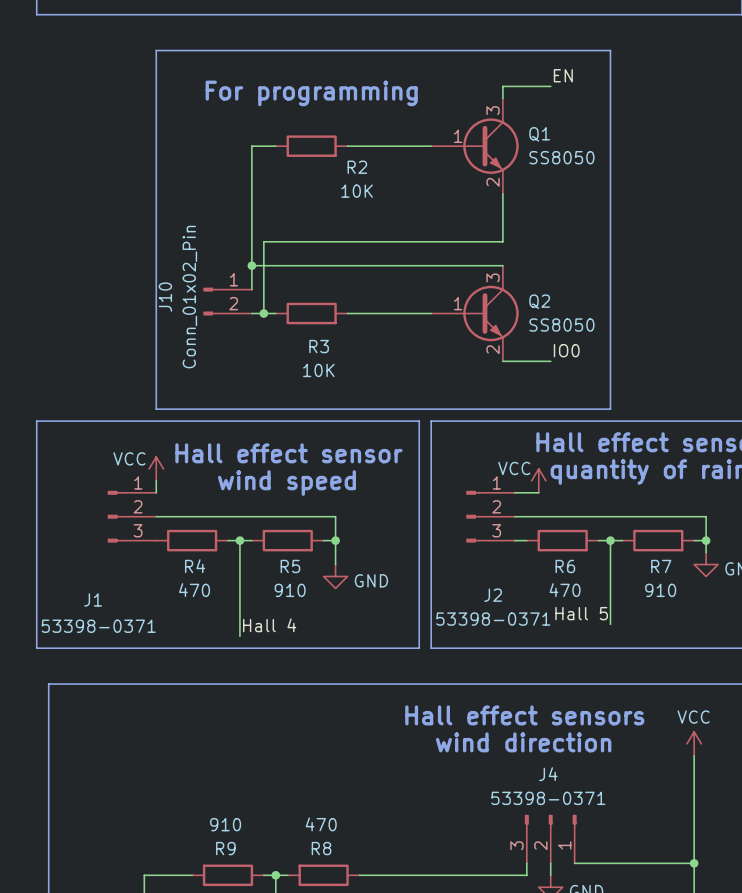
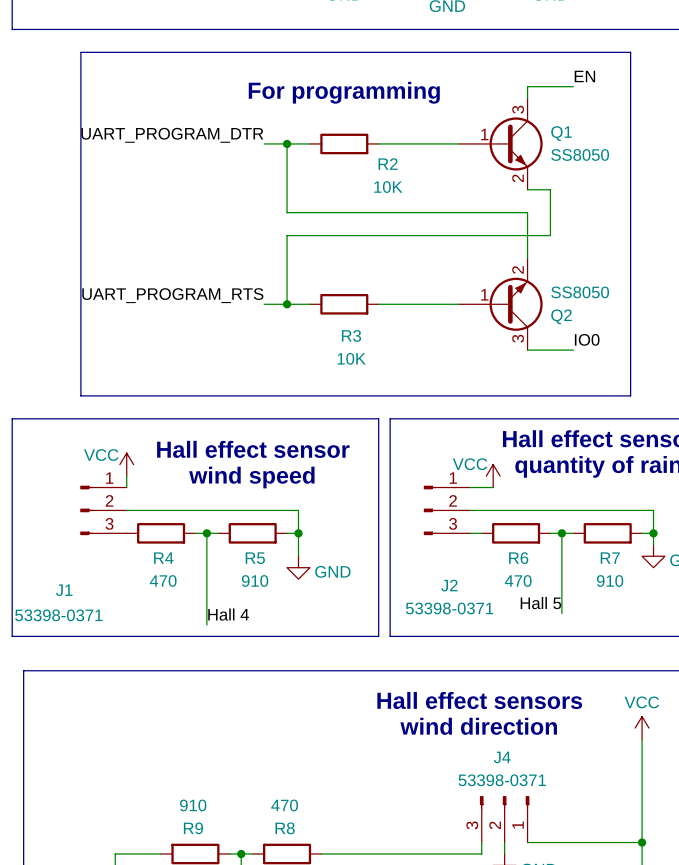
line: (156, 50) (610, 50) (610, 409) (156, 409) (156, 50) -> (80, 52) (80, 395) (630, 395) (630, 52) (80, 52)
label position: EN (563, 75) -> EN (584, 76)
wire: (550, 86) (502, 86) (502, 98) -> (573, 86) (527, 86) (527, 98)
text position: For programming (311, 93) -> For programming (344, 92)
label: none -> UART_PROGRAM_DTR (172, 135)
wire: none -> (264, 143) (309, 143)
wire: none -> (287, 143) (287, 212) (527, 212) (527, 258)
junction: none -> (287, 143)
wire: (275, 146) (251, 146) (251, 289) -> none
R2 position: (311, 146) -> (344, 143)
wire: (347, 146) (431, 146) -> (378, 143) (458, 143)
Q1 position: (474, 146) -> (500, 143)
wire: none -> (527, 189) (550, 189) (550, 235) (287, 235) (287, 304)
wire: (502, 193) (502, 241) (263, 241) (263, 313) -> none
wire: (251, 265) (502, 265) -> none
junction: (251, 265) -> none
label: none -> UART_PROGRAM_RTS (172, 295)
J10: Conn_01x02_Pin (227, 301) -> none
wire: none -> (264, 304) (309, 304)
junction: none -> (287, 304)
wire: (251, 313) (275, 313) -> none
junction: (263, 313) -> none
R3 position: (311, 313) -> (344, 304)
wire: (347, 313) (431, 313) -> (378, 304) (458, 304)
Q2 position: (474, 313) -> (500, 304)
Q2 flip: as is (490, 313) -> up-down (516, 304)
label position: IO0 (566, 350) -> IO0 (587, 339)
wire: (502, 361) (550, 361) -> (527, 350) (573, 350)

